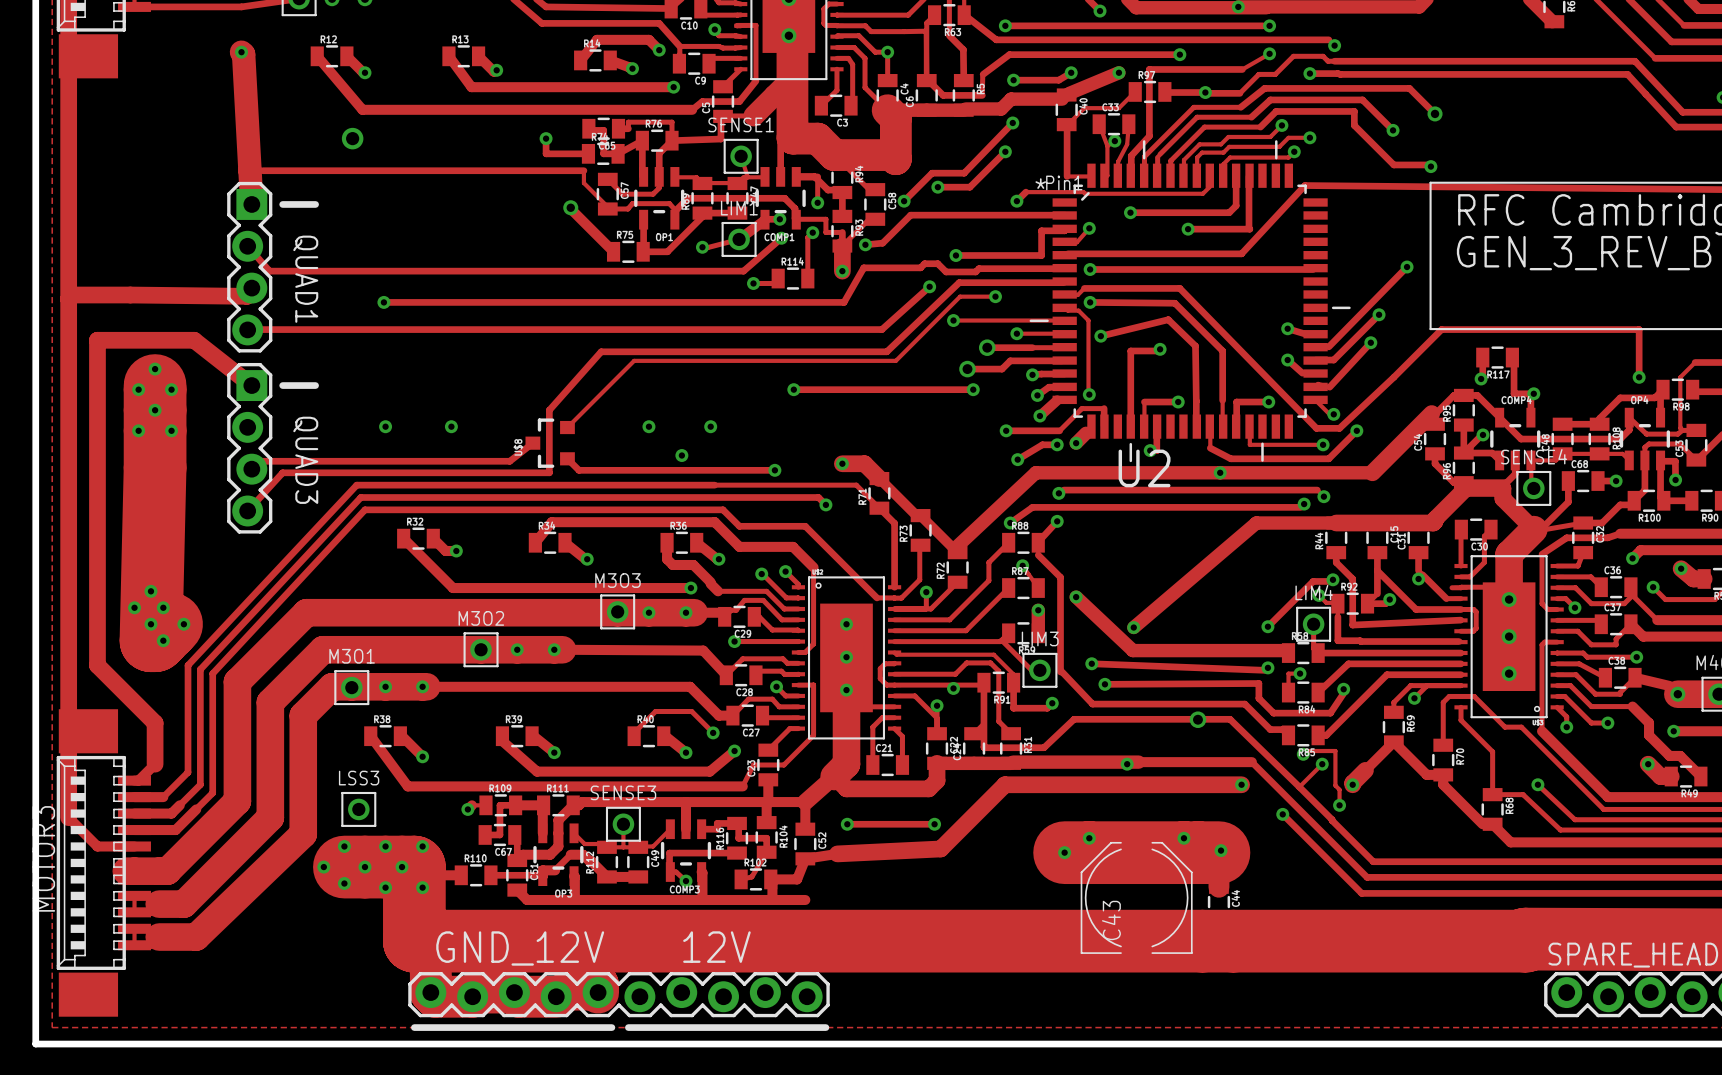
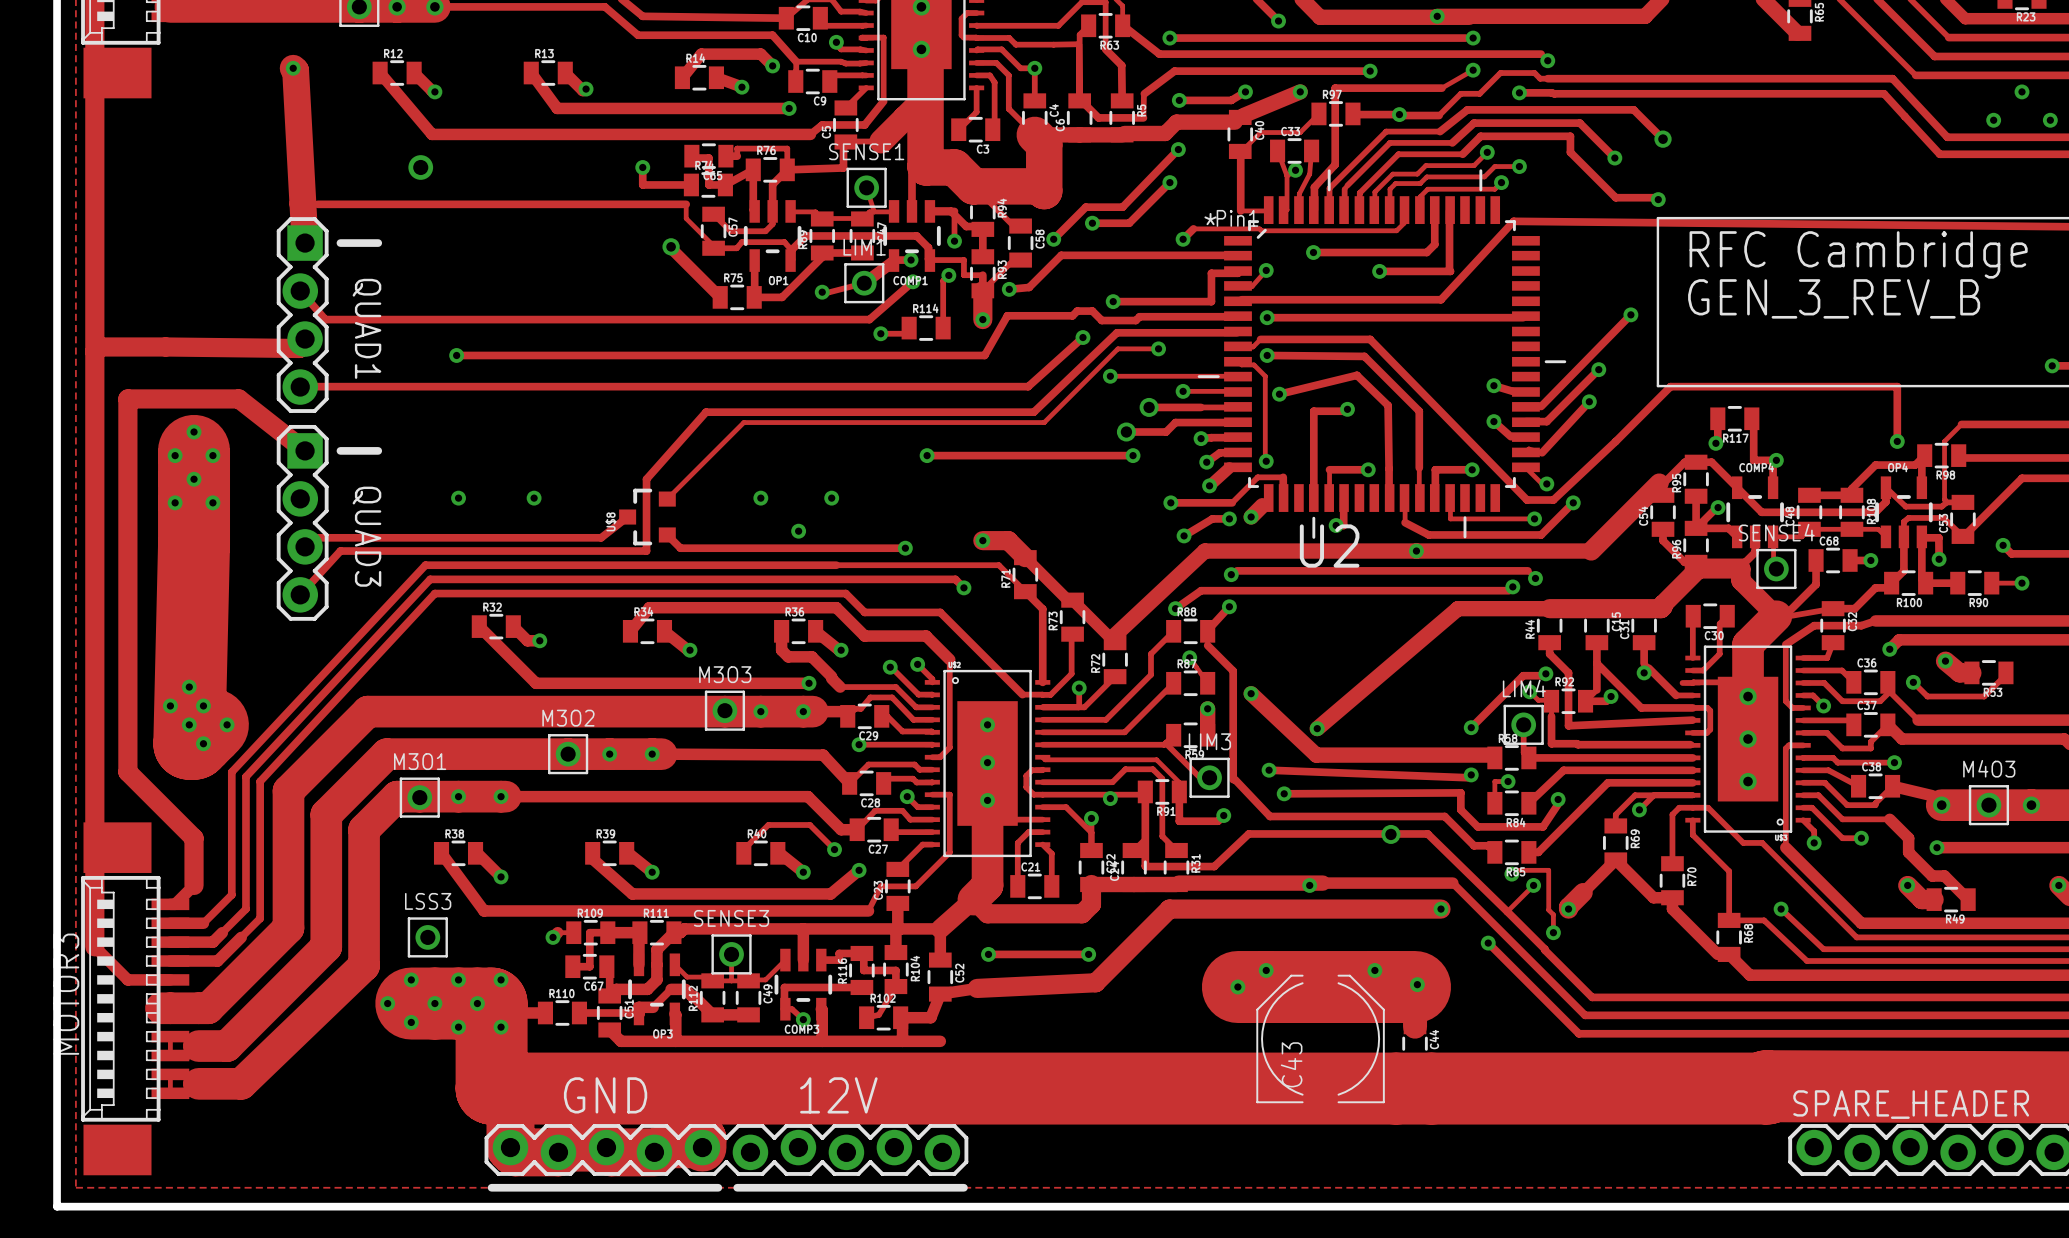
text: none -> GND (605, 1095)
text: GND_12V (520, 948) -> none

